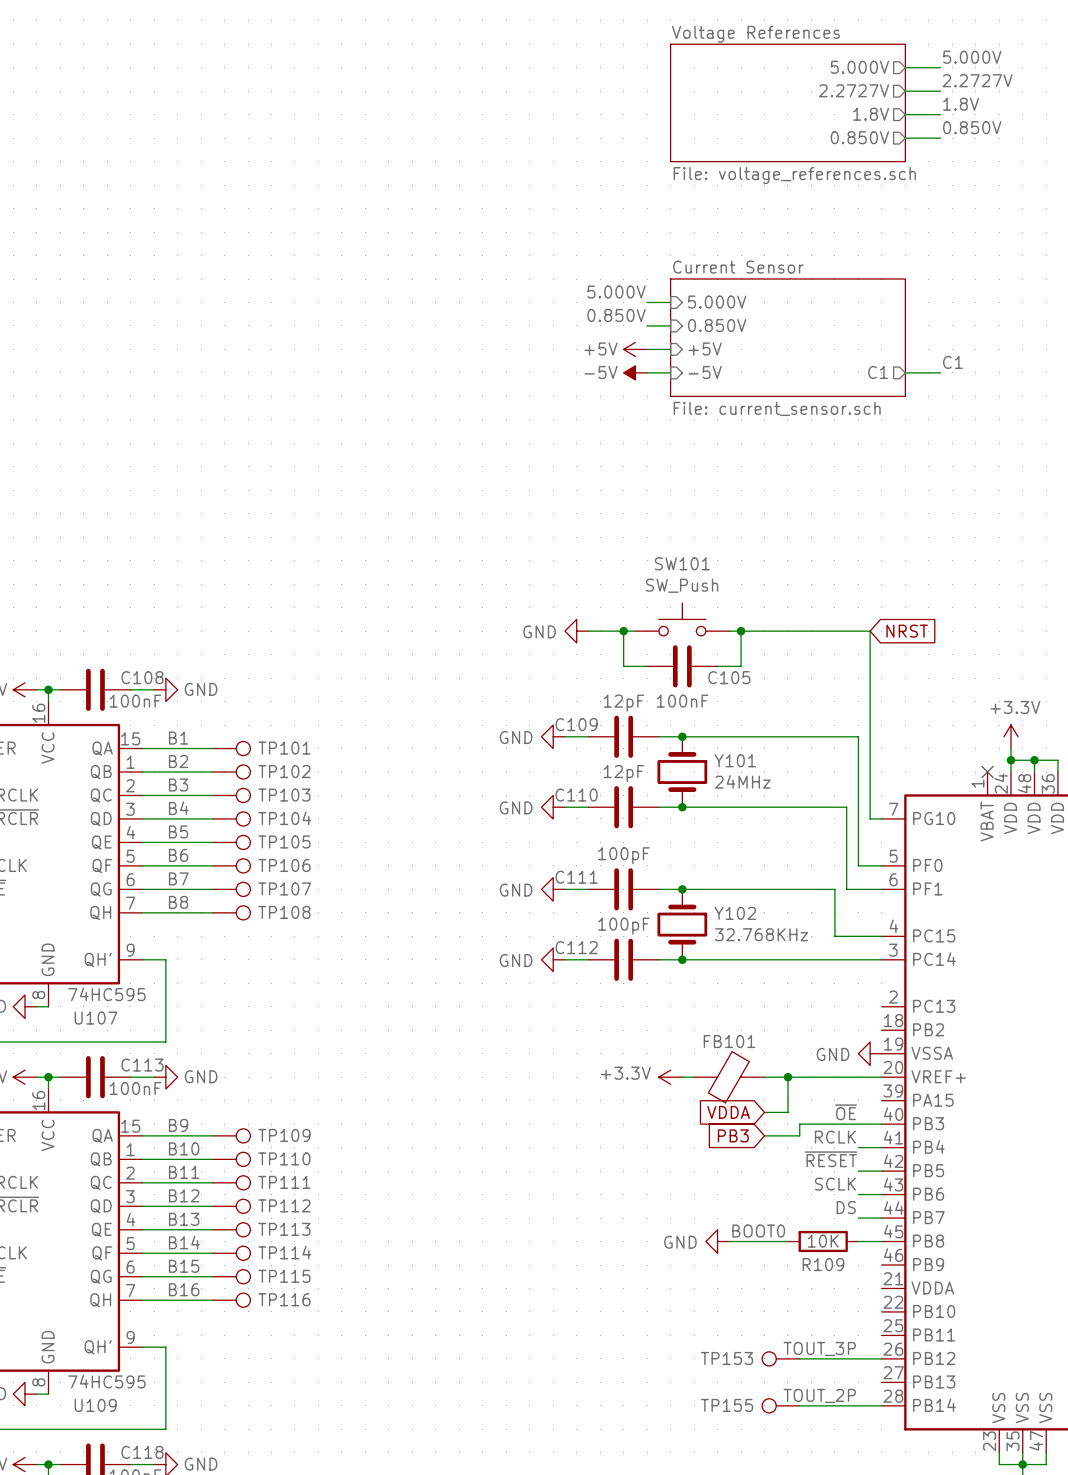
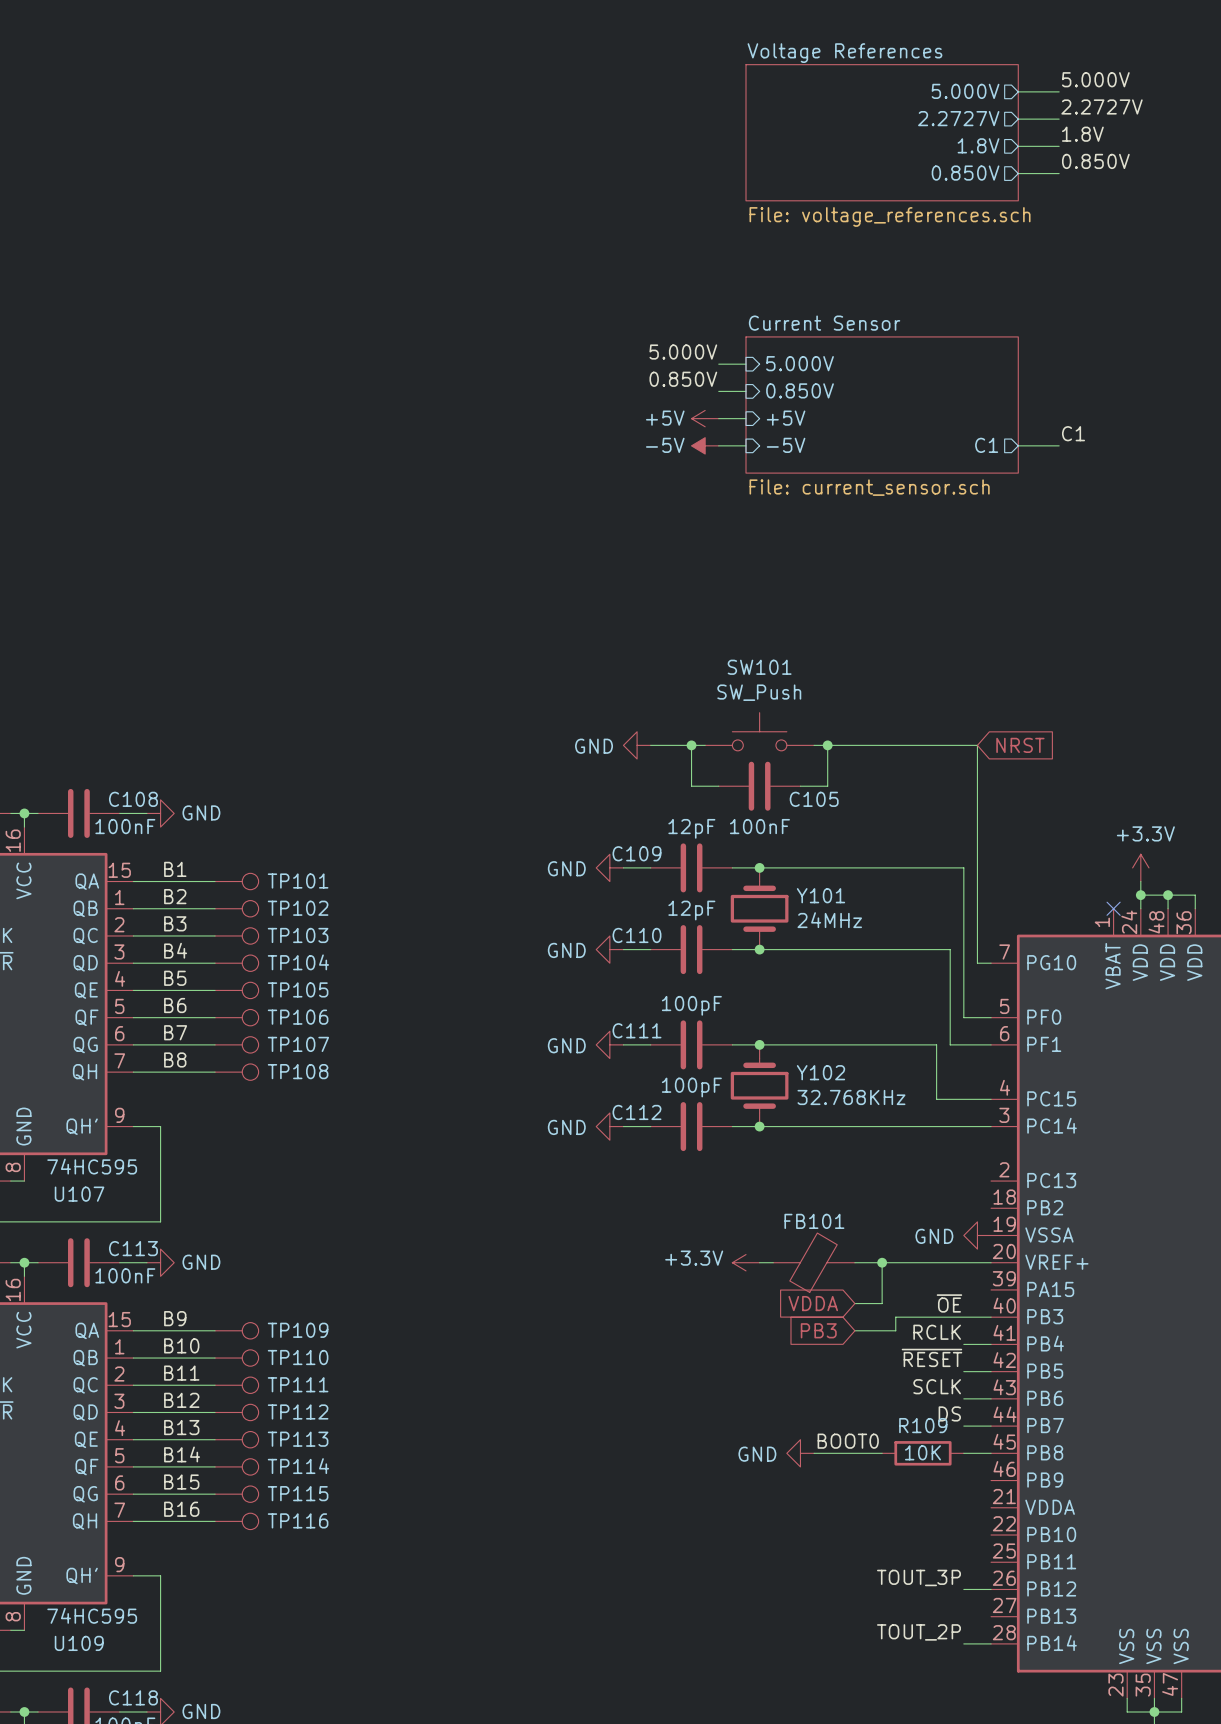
R109 name position: R109 (823, 1264) -> R109 (923, 1425)
TP153: (780, 1358) -> none
wire: (799, 1358) (858, 1358) -> none
TP155: (780, 1405) -> none
wire: (799, 1405) (858, 1405) -> none

